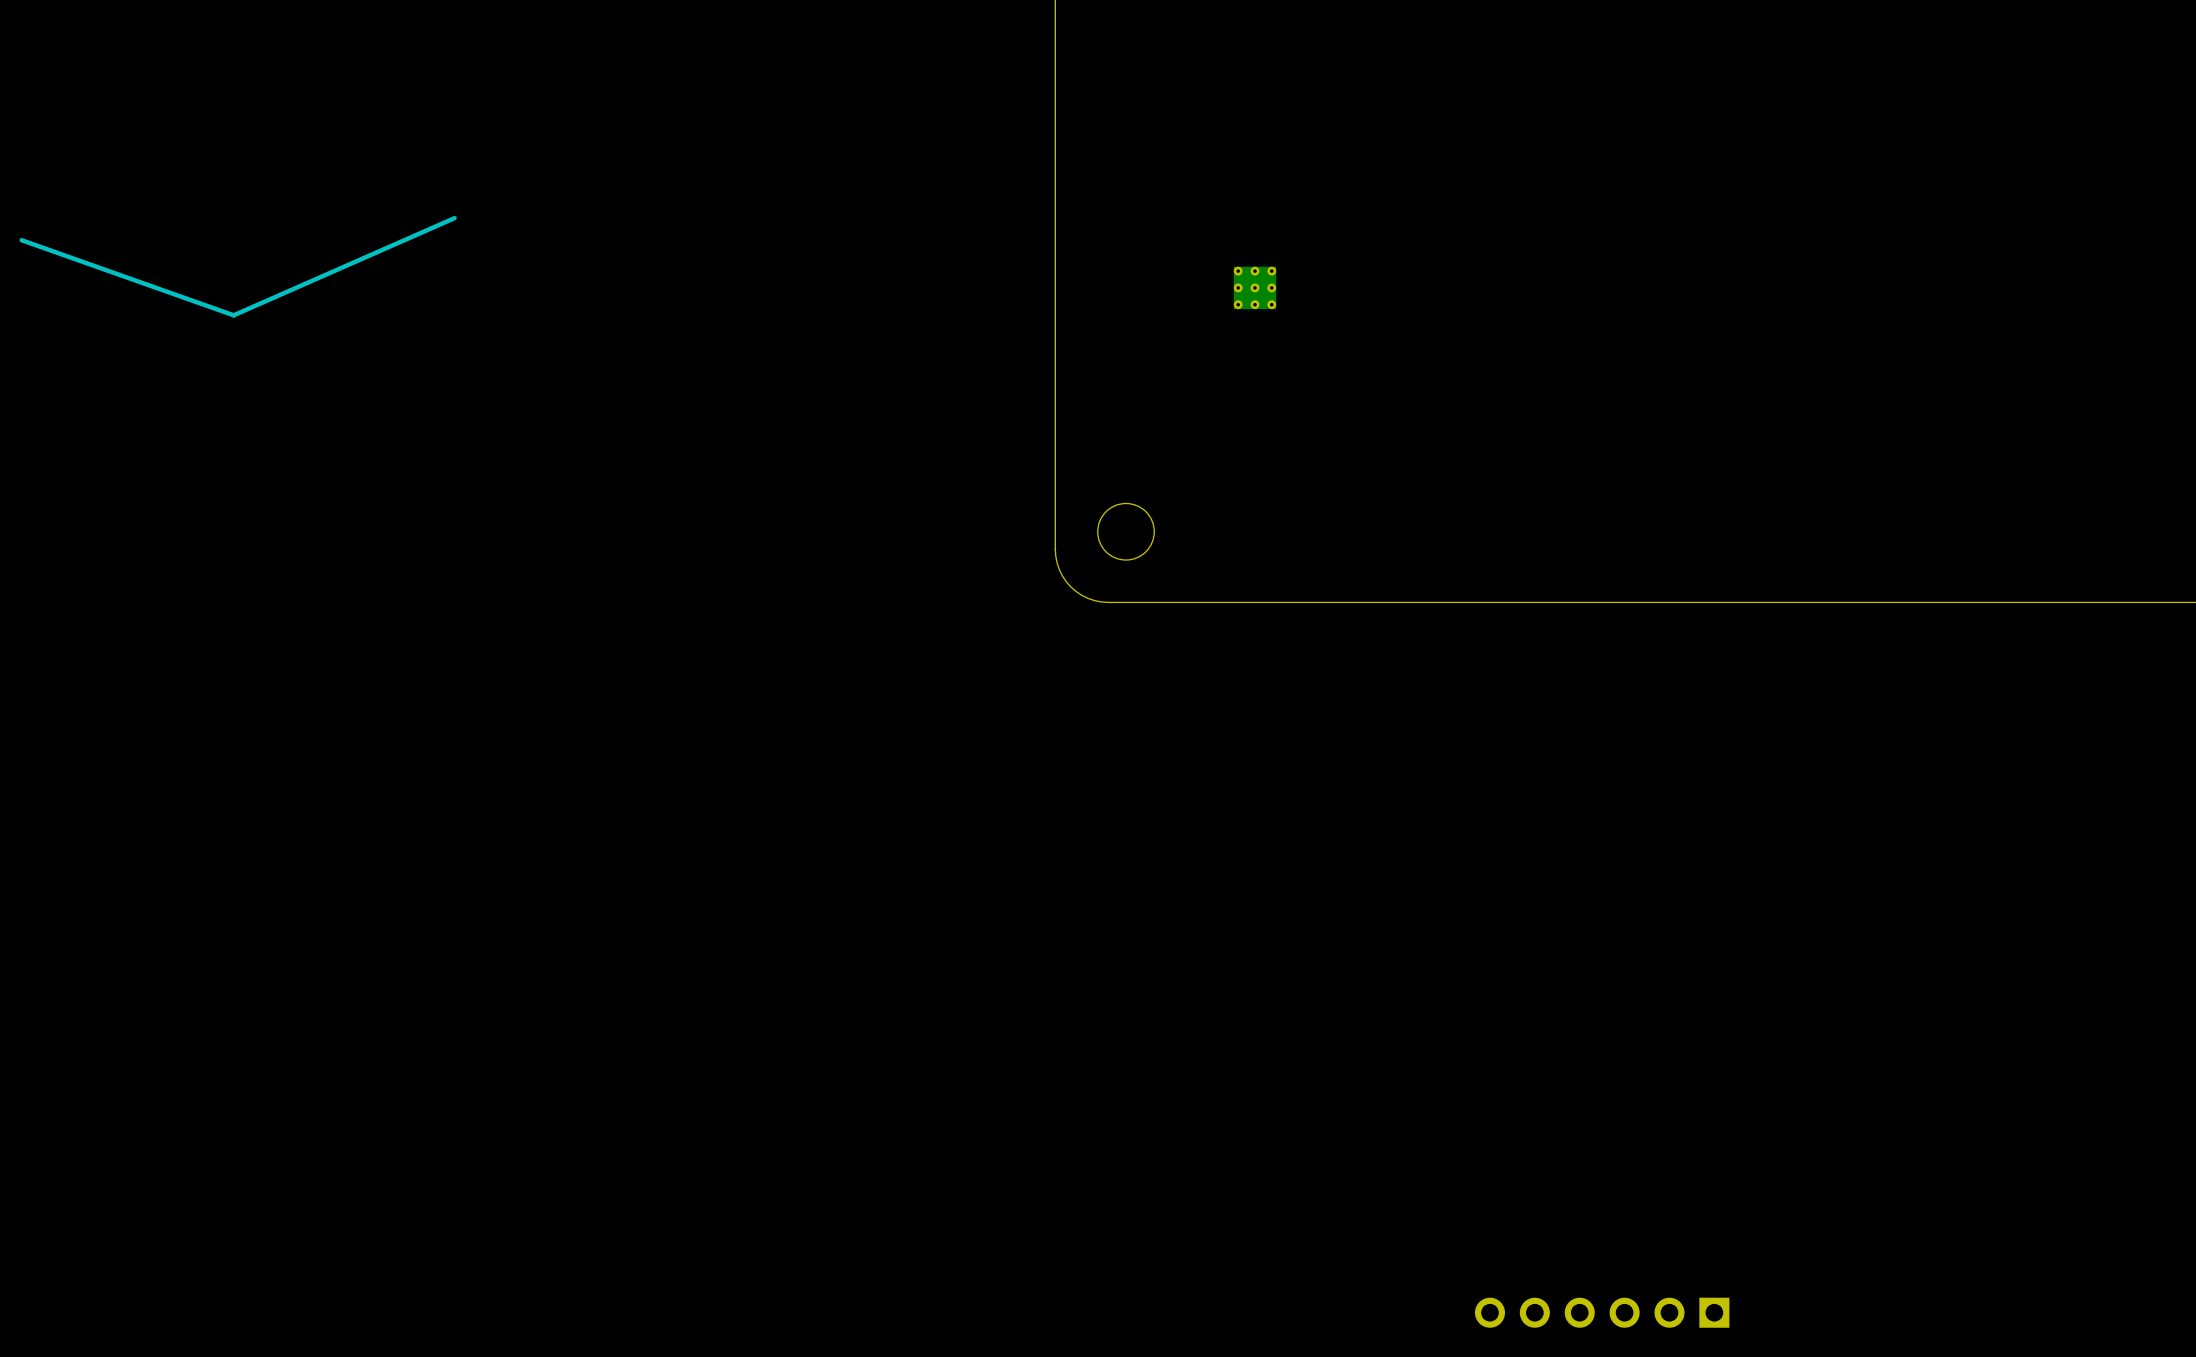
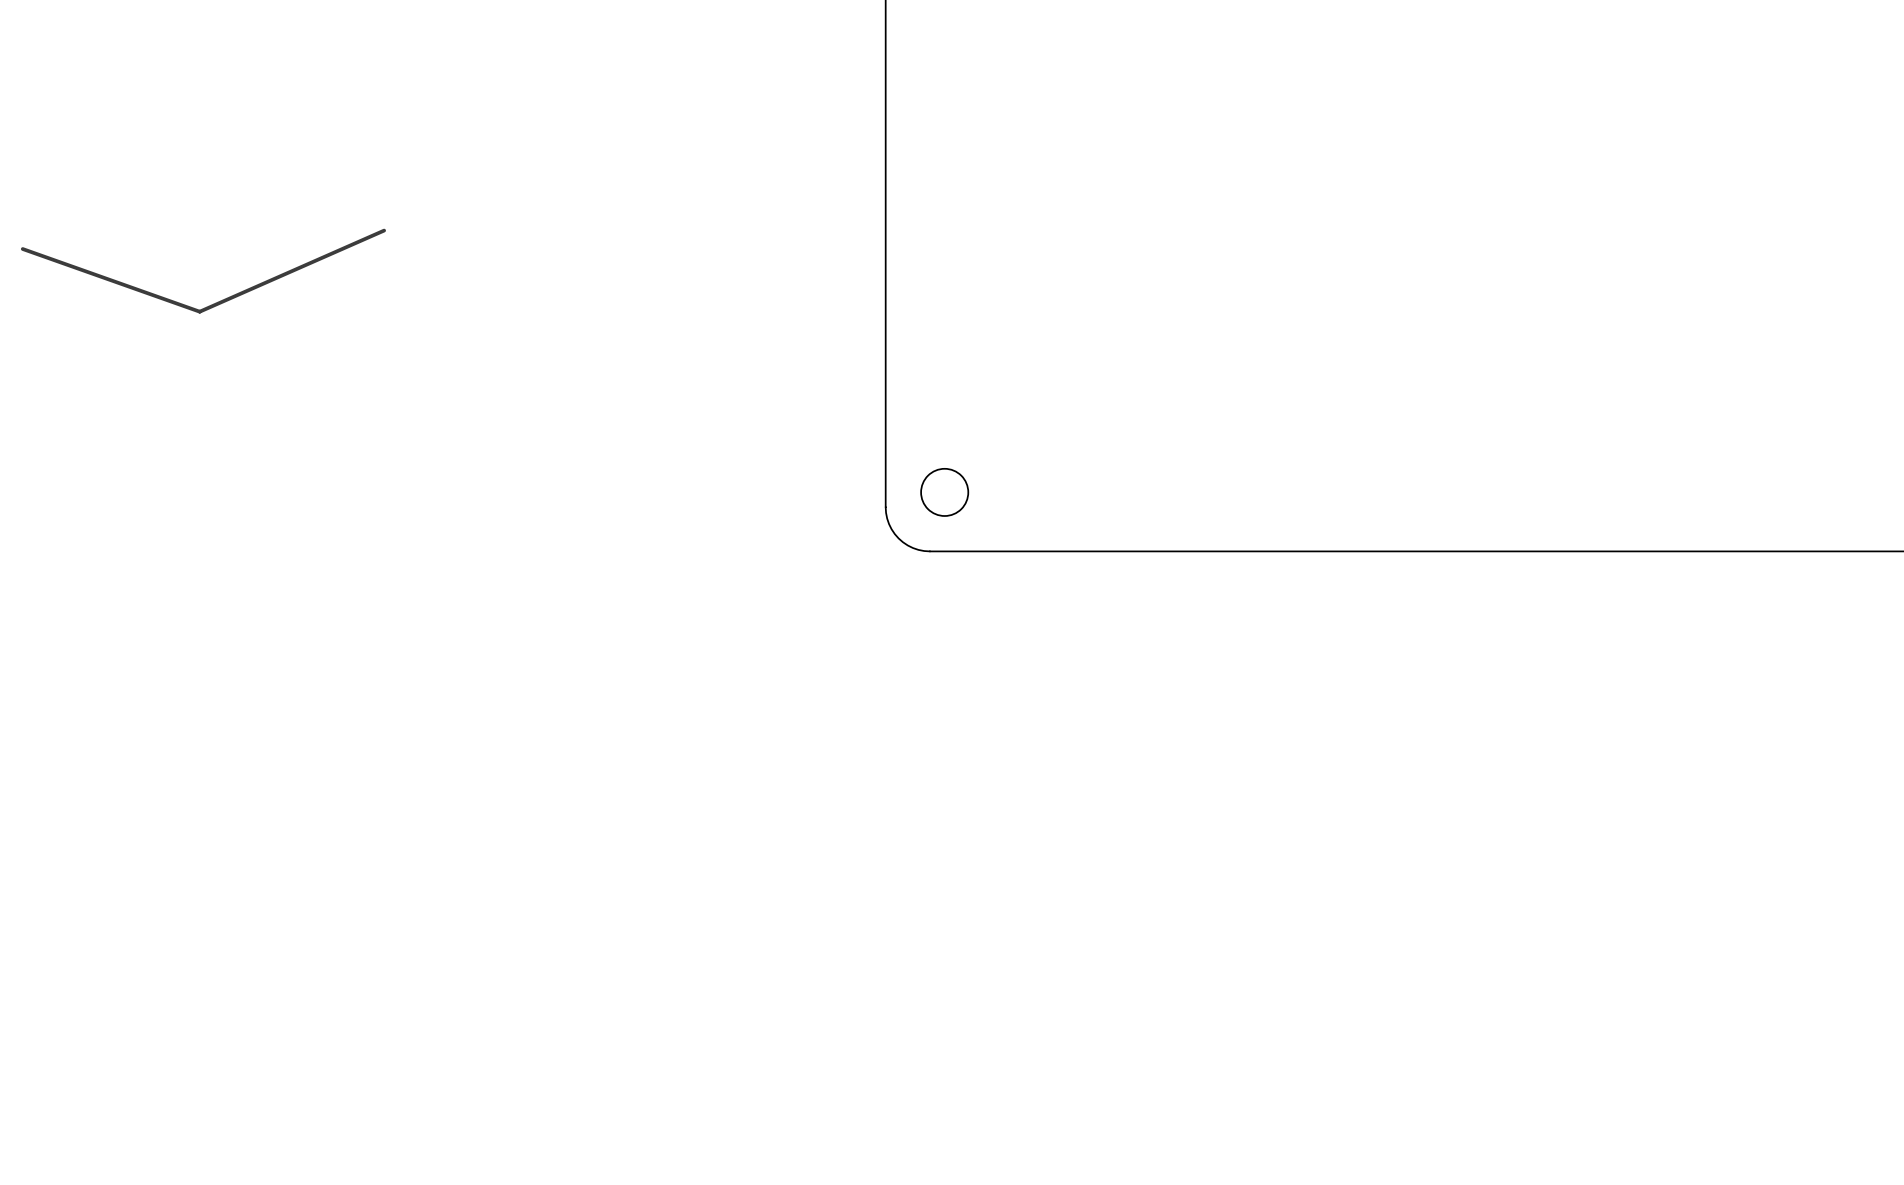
part: (1254, 287) -> none
part: (1602, 1312) -> none

